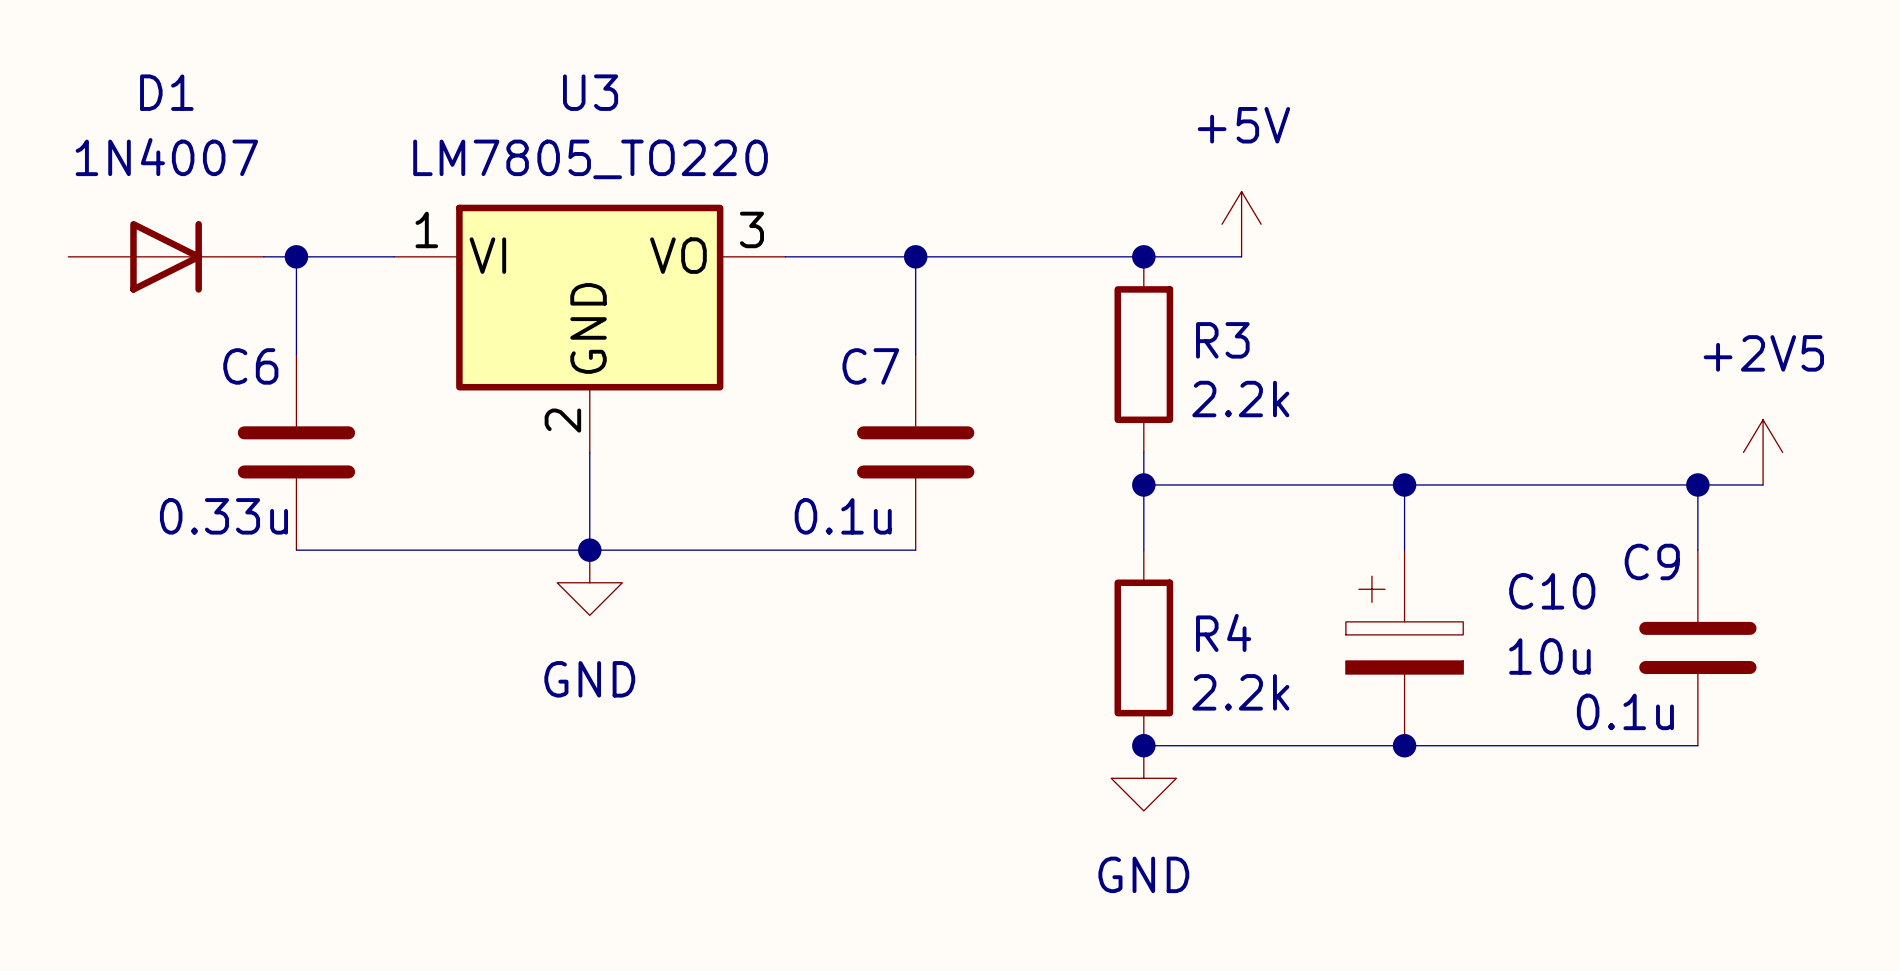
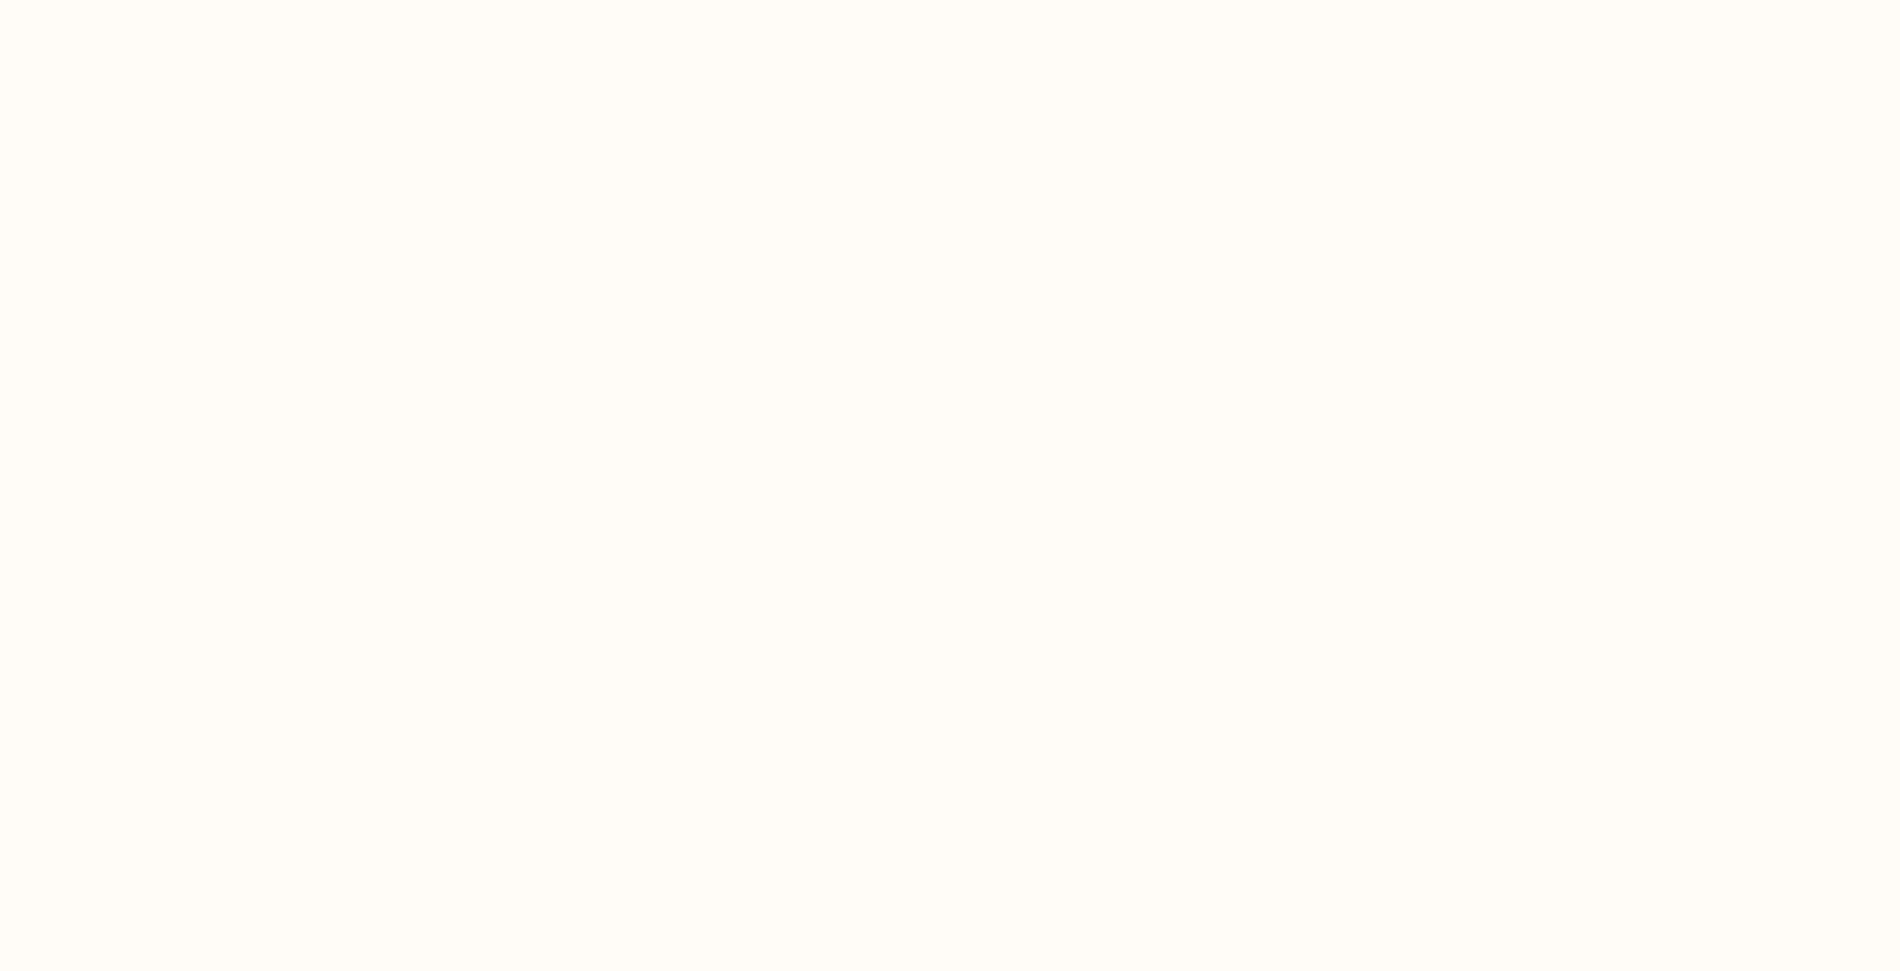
power symbol: +5V (1241, 224) -> none
D1: 1N4007 (166, 256) -> none
wire: (263, 256) (394, 256) -> none
wire: (296, 256) (296, 354) -> none
junction: (296, 256) -> none
wire: (785, 256) (1241, 256) -> none
wire: (915, 256) (915, 354) -> none
junction: (915, 256) -> none
junction: (1143, 256) -> none
U3: LM7805_TO220 (589, 328) -> none
R3: 2.2k (1143, 354) -> none
C6: 0.33u (296, 452) -> none
wire: (589, 452) (589, 550) -> none
C7: 0.1u (915, 452) -> none
wire: (1143, 452) (1143, 550) -> none
power symbol: +2V5 (1763, 452) -> none
wire: (1143, 484) (1763, 484) -> none
junction: (1143, 484) -> none
wire: (1404, 484) (1404, 550) -> none
junction: (1404, 484) -> none
wire: (1697, 484) (1697, 550) -> none
junction: (1697, 484) -> none
wire: (296, 550) (915, 550) -> none
junction: (589, 550) -> none
power symbol: GND (589, 582) -> none
R4: 2.2k (1143, 647) -> none
C10: 10u (1404, 647) -> none
C9: 0.1u (1697, 647) -> none
wire: (1143, 745) (1697, 745) -> none
junction: (1143, 745) -> none
junction: (1404, 745) -> none
power symbol: GND (1143, 778) -> none

